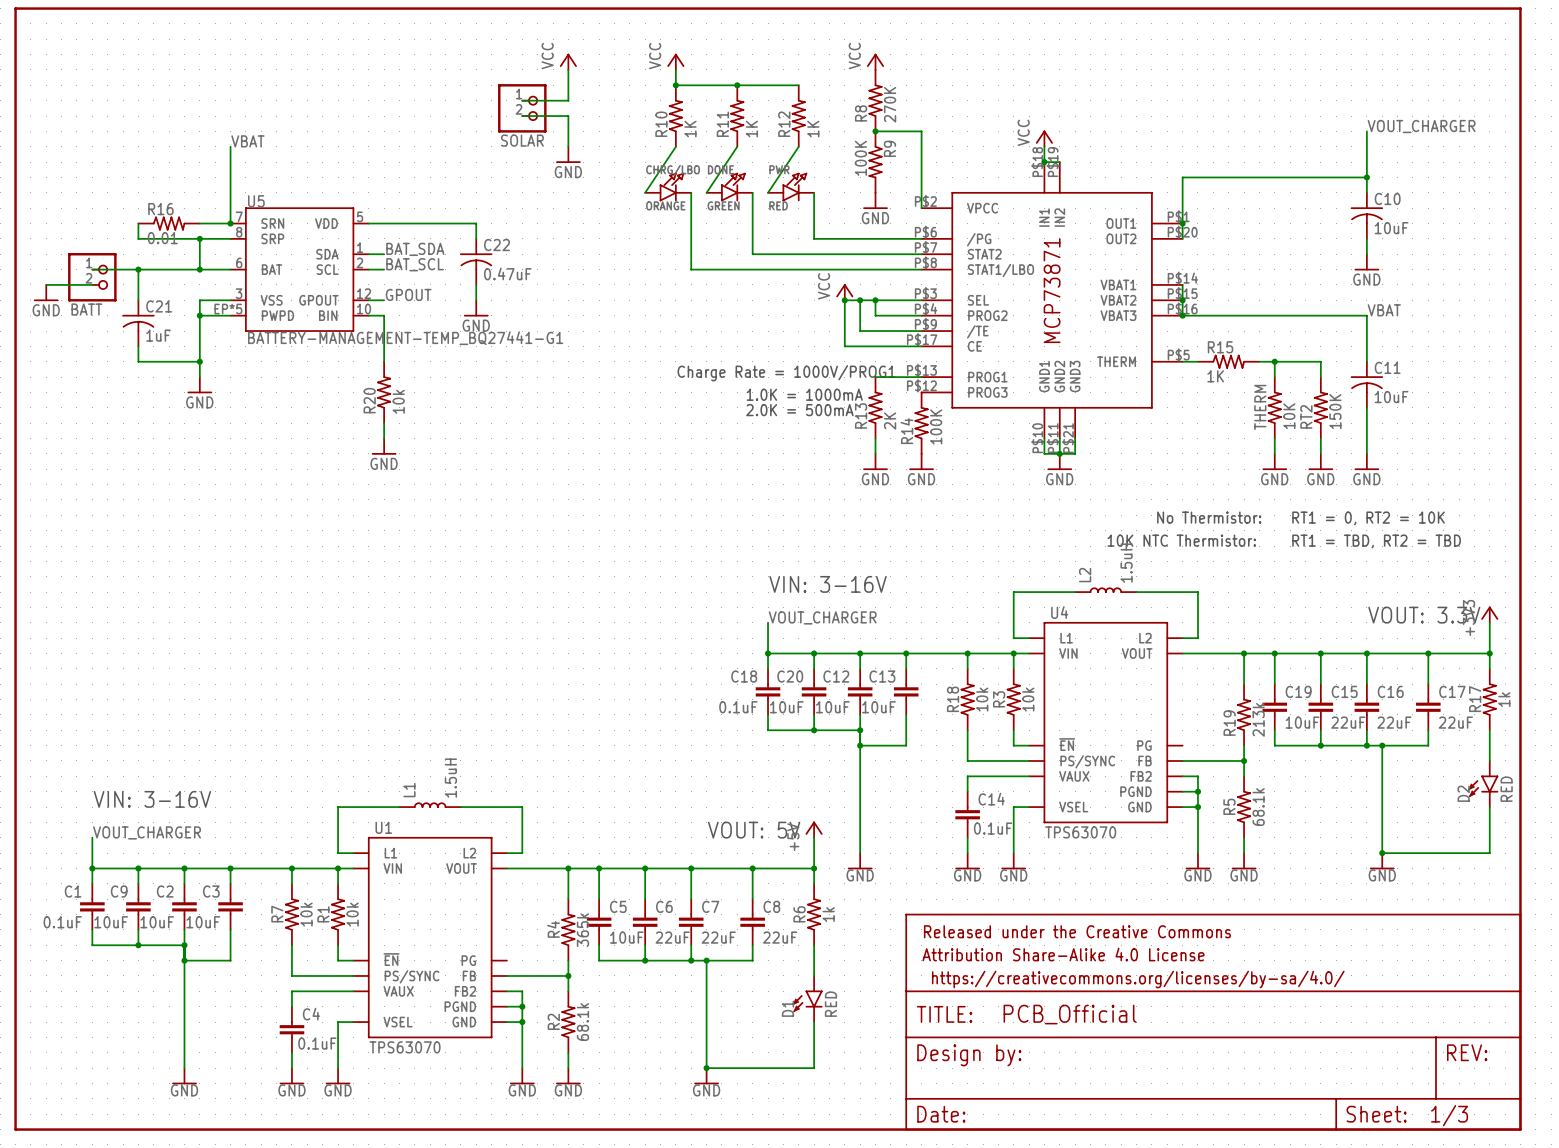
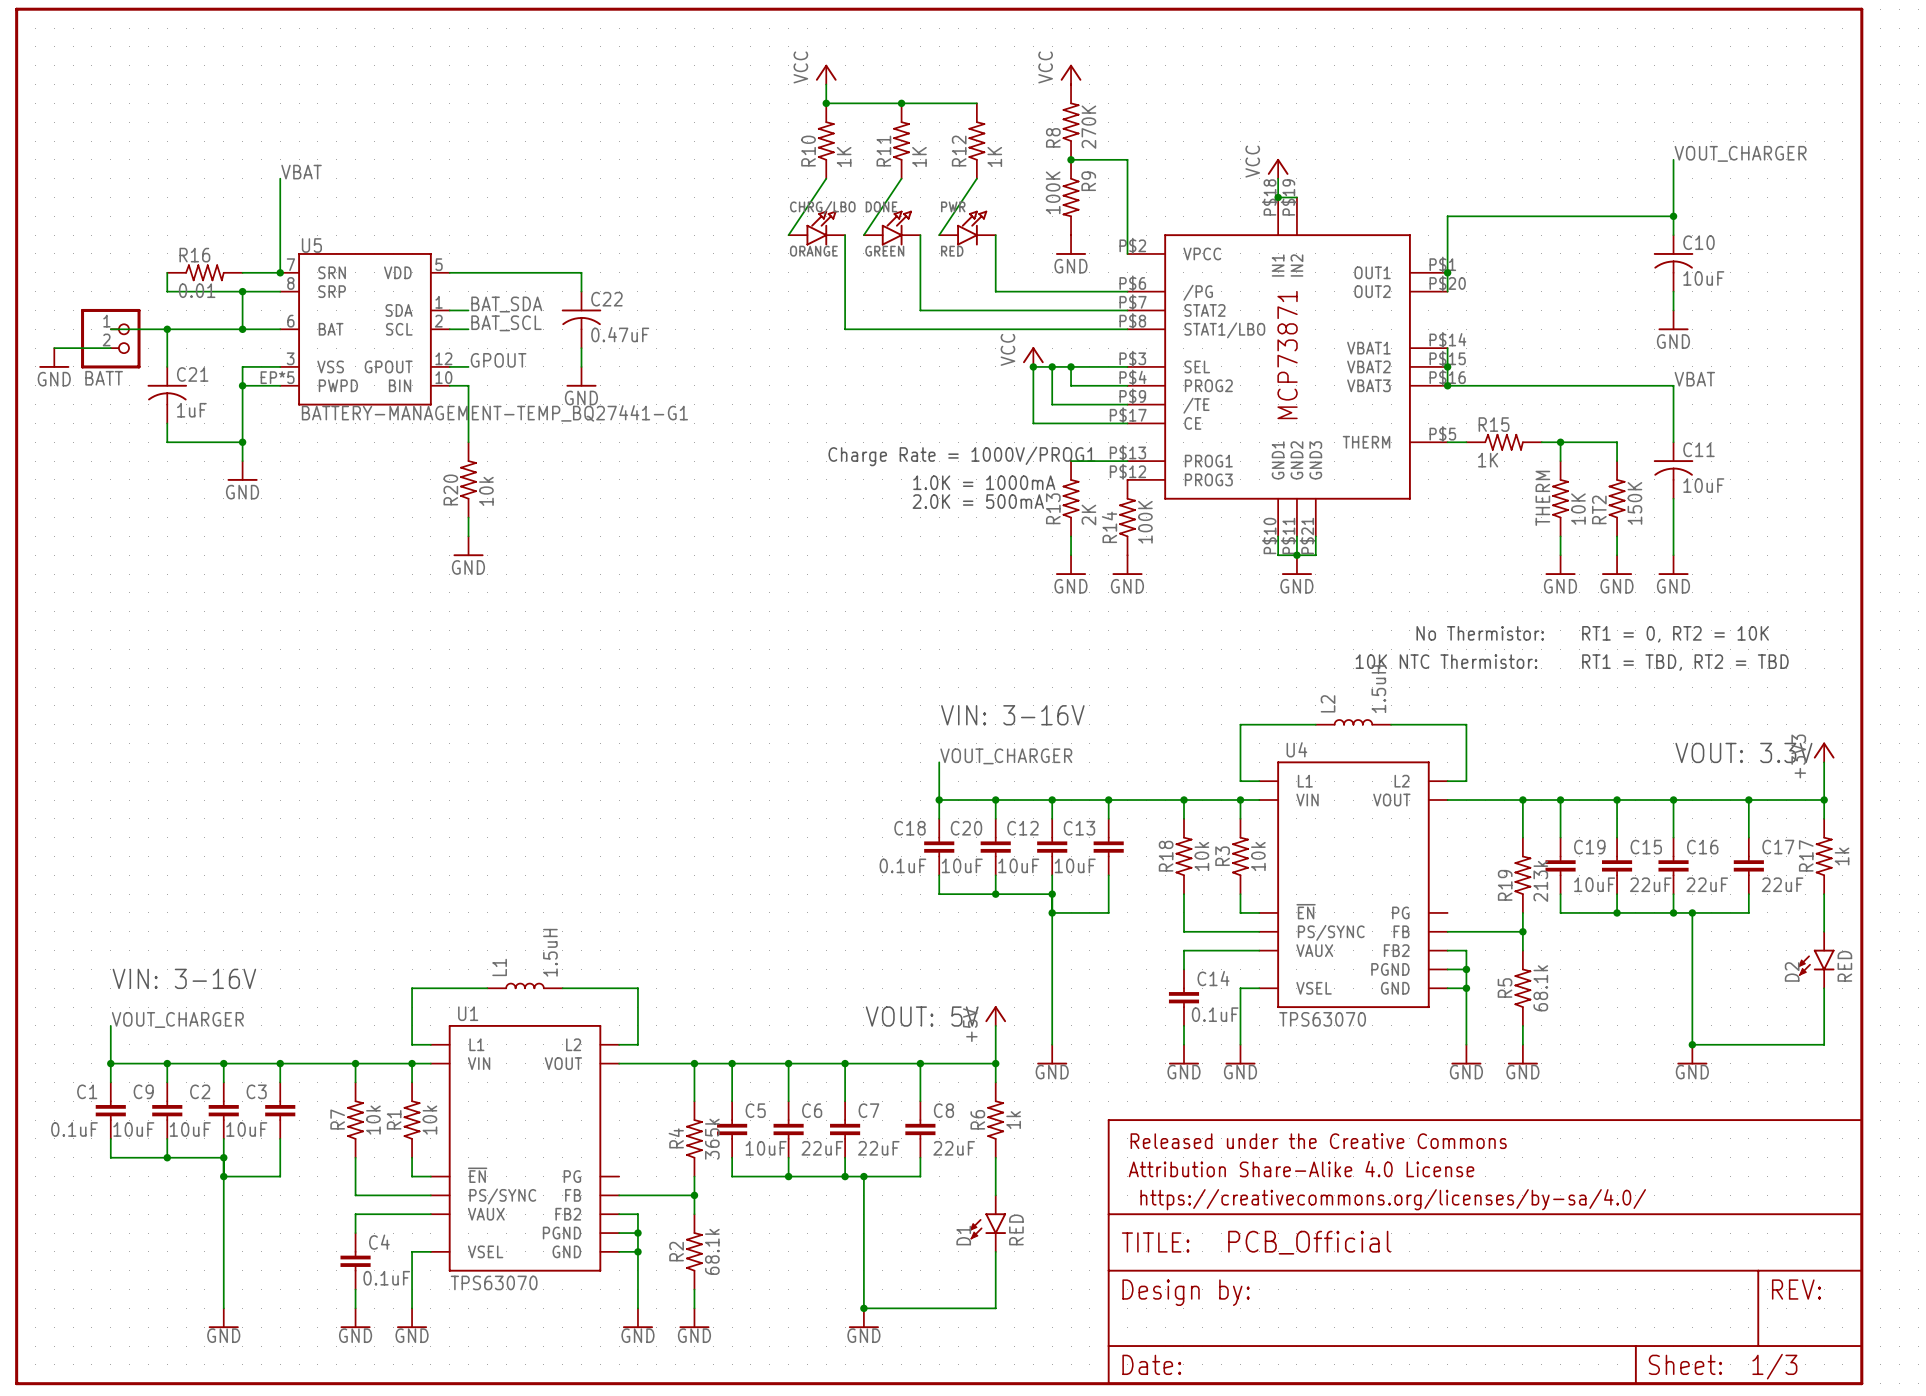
power symbol: VCC (568, 61) -> none
wire: (568, 69) (568, 100) (522, 100) -> none
SOLAR: (522, 108) -> none
wire: (522, 116) (568, 116) (568, 146) -> none
power symbol: GND (568, 154) -> none

